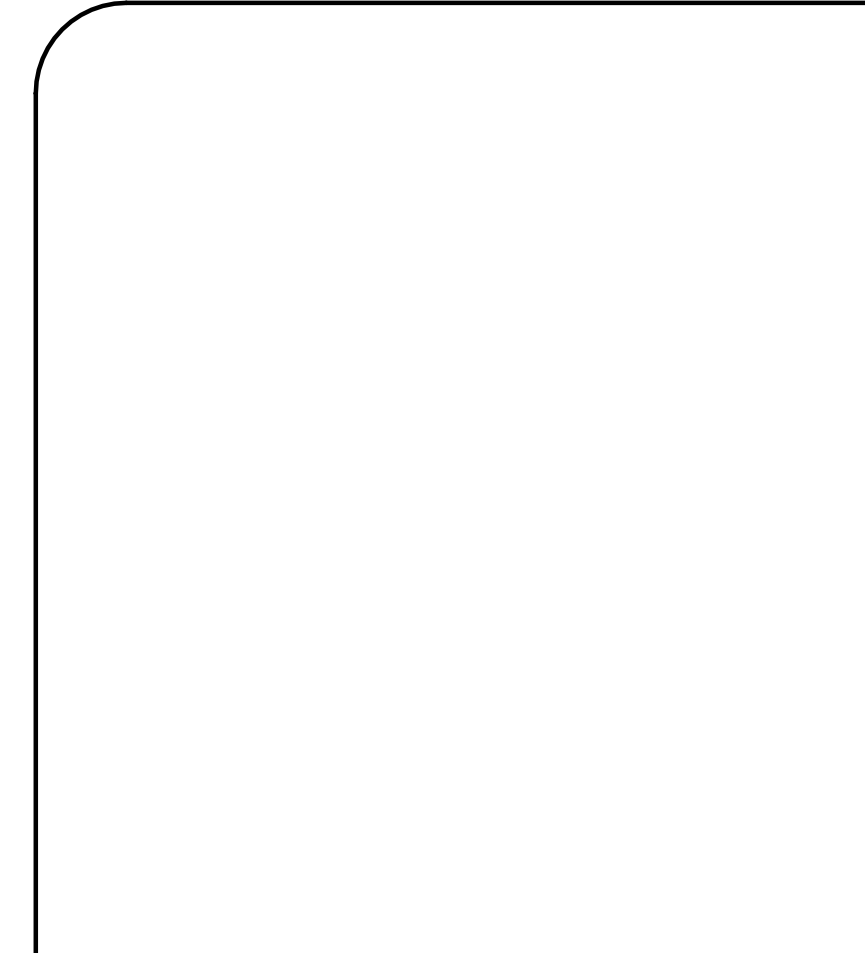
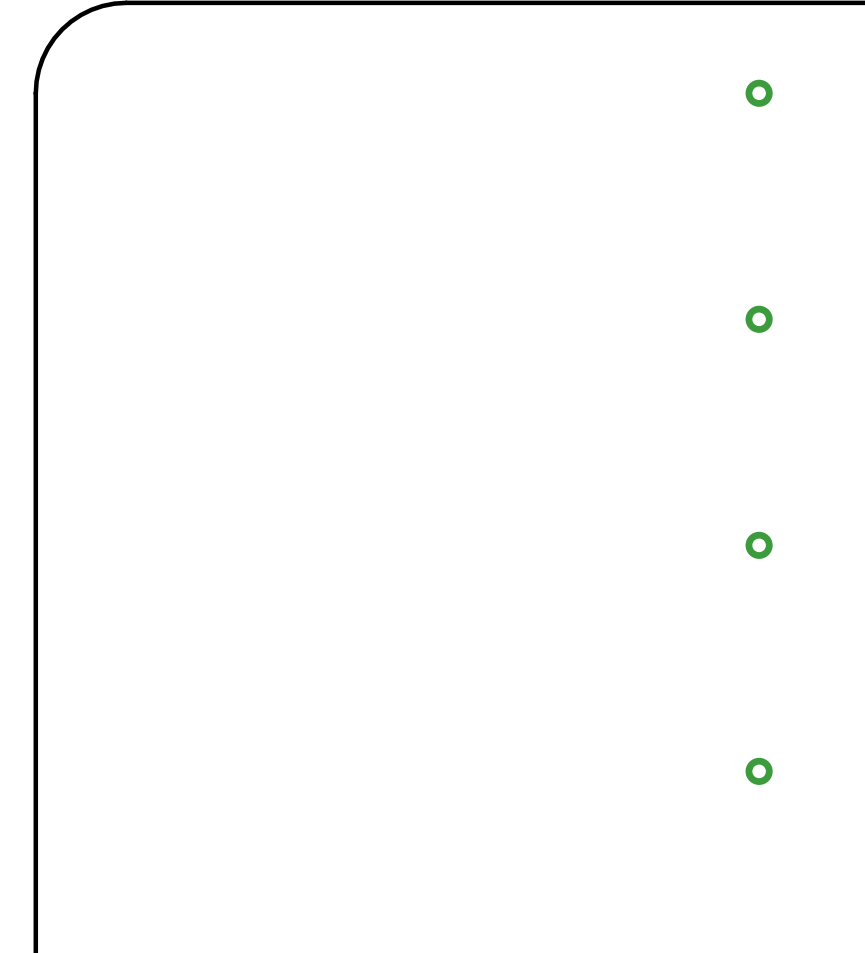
via: none -> (759, 93)
via: none -> (759, 319)
via: none -> (759, 545)
via: none -> (759, 771)

